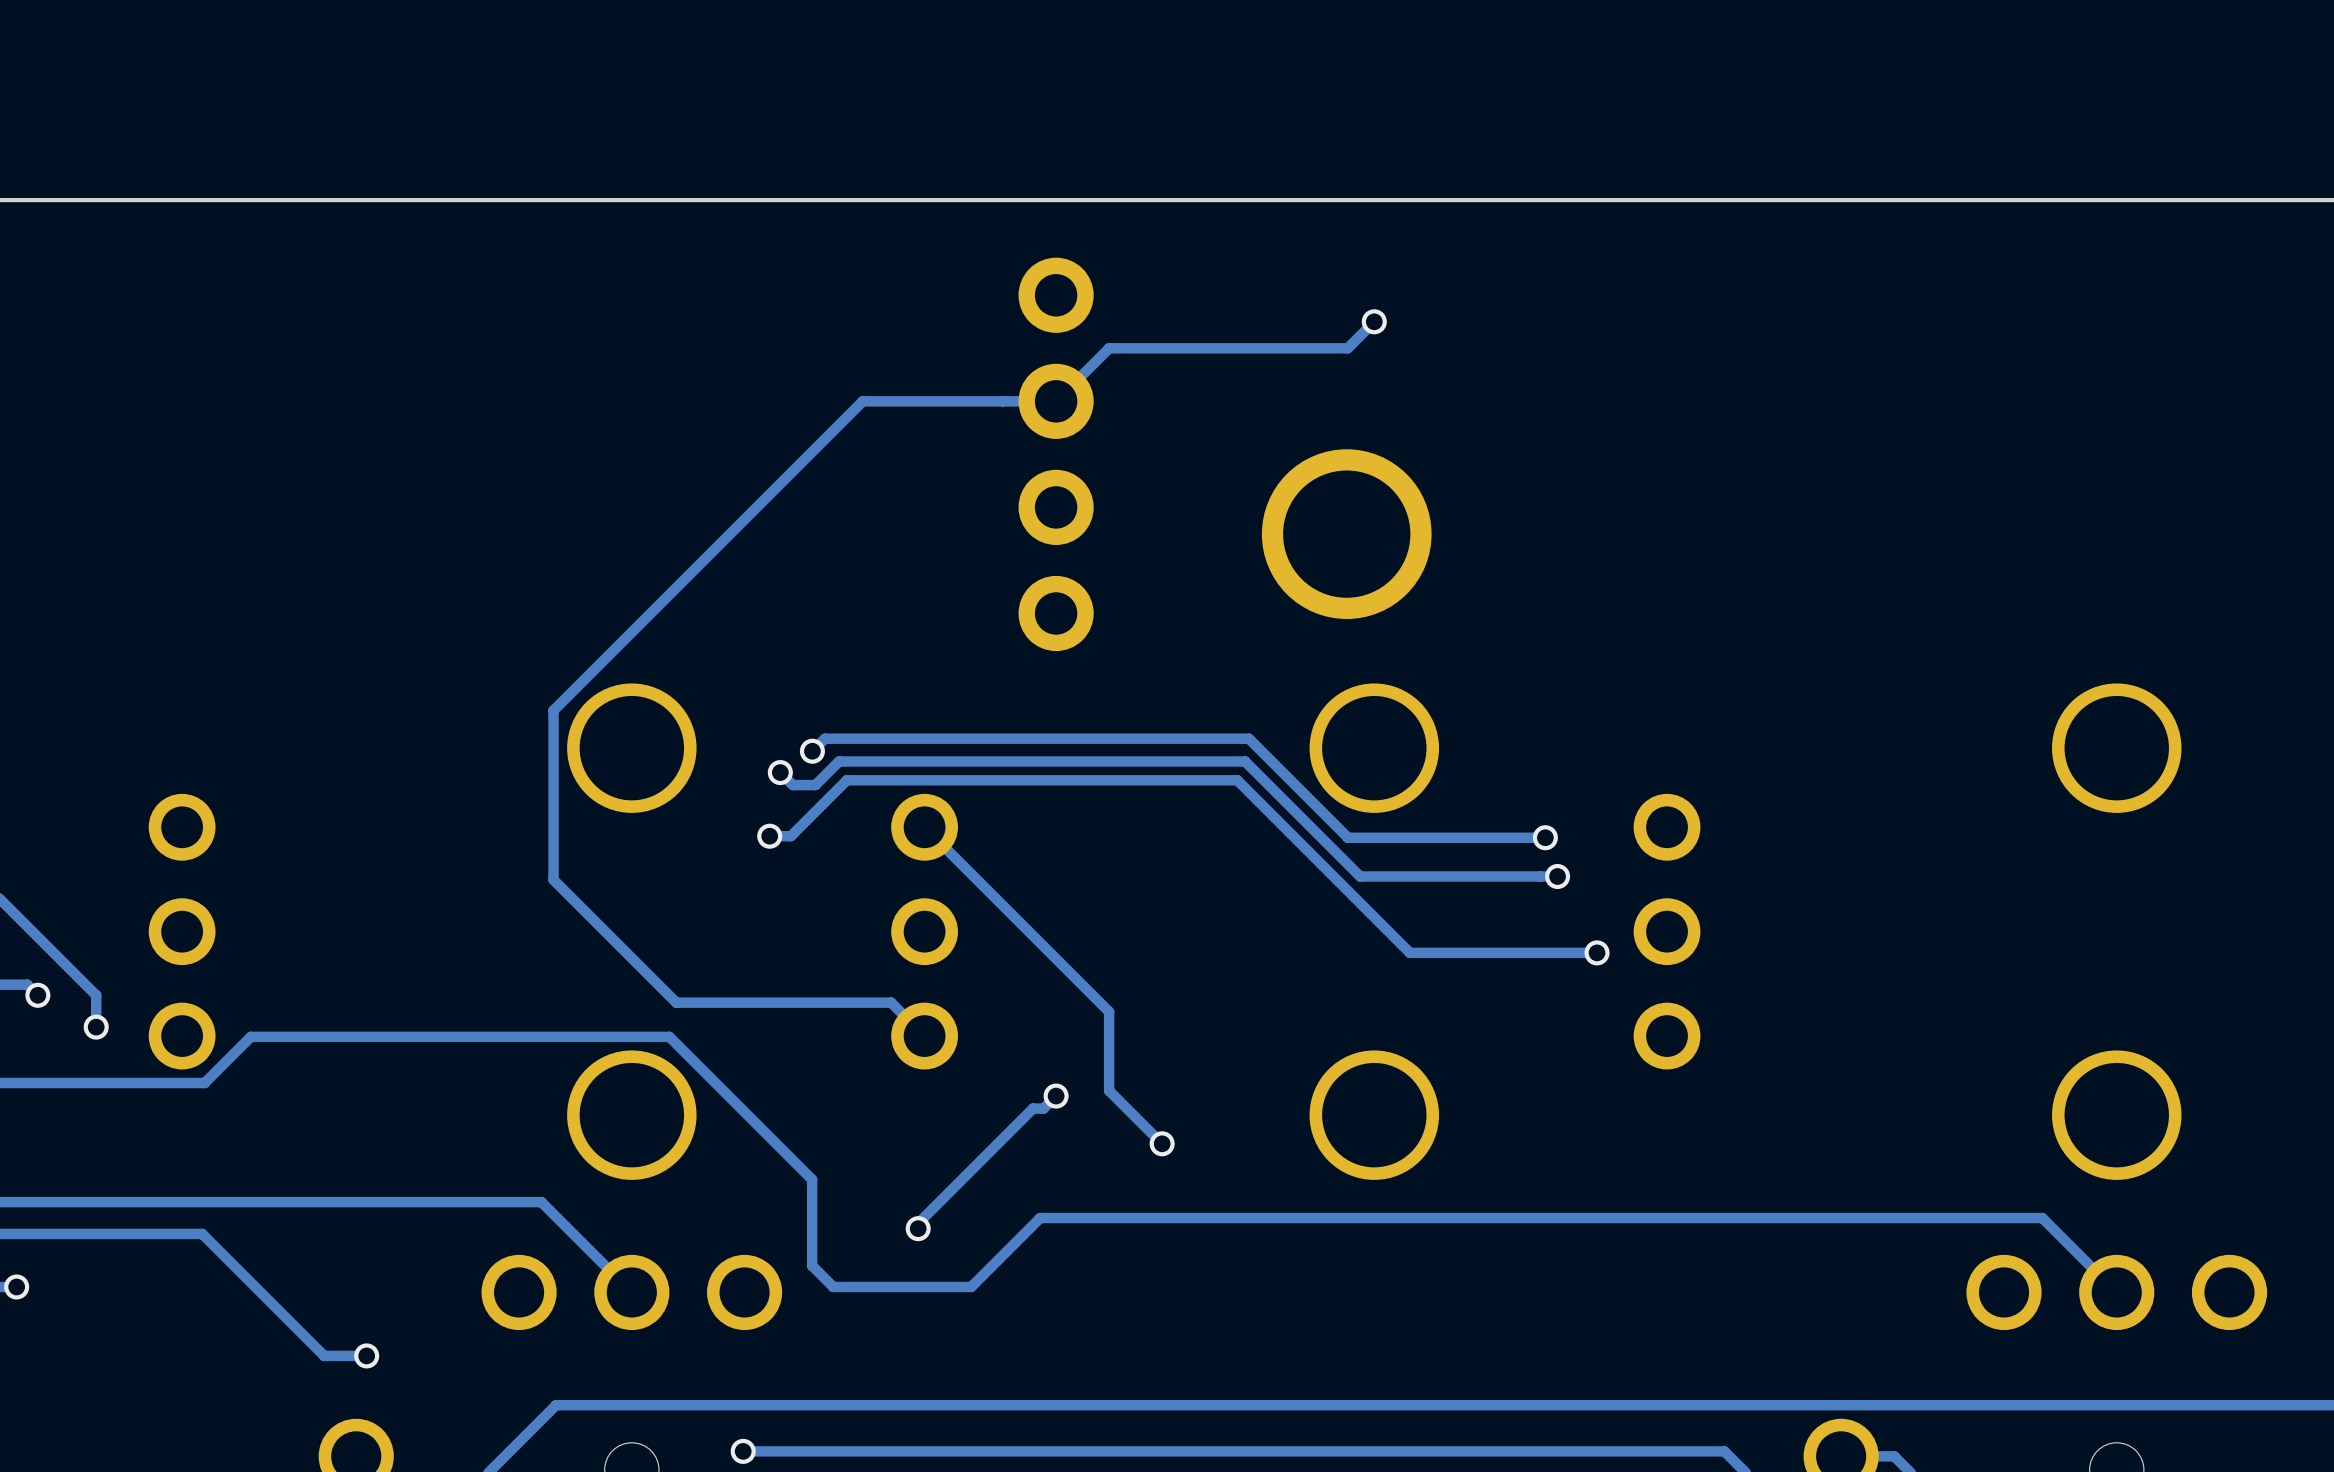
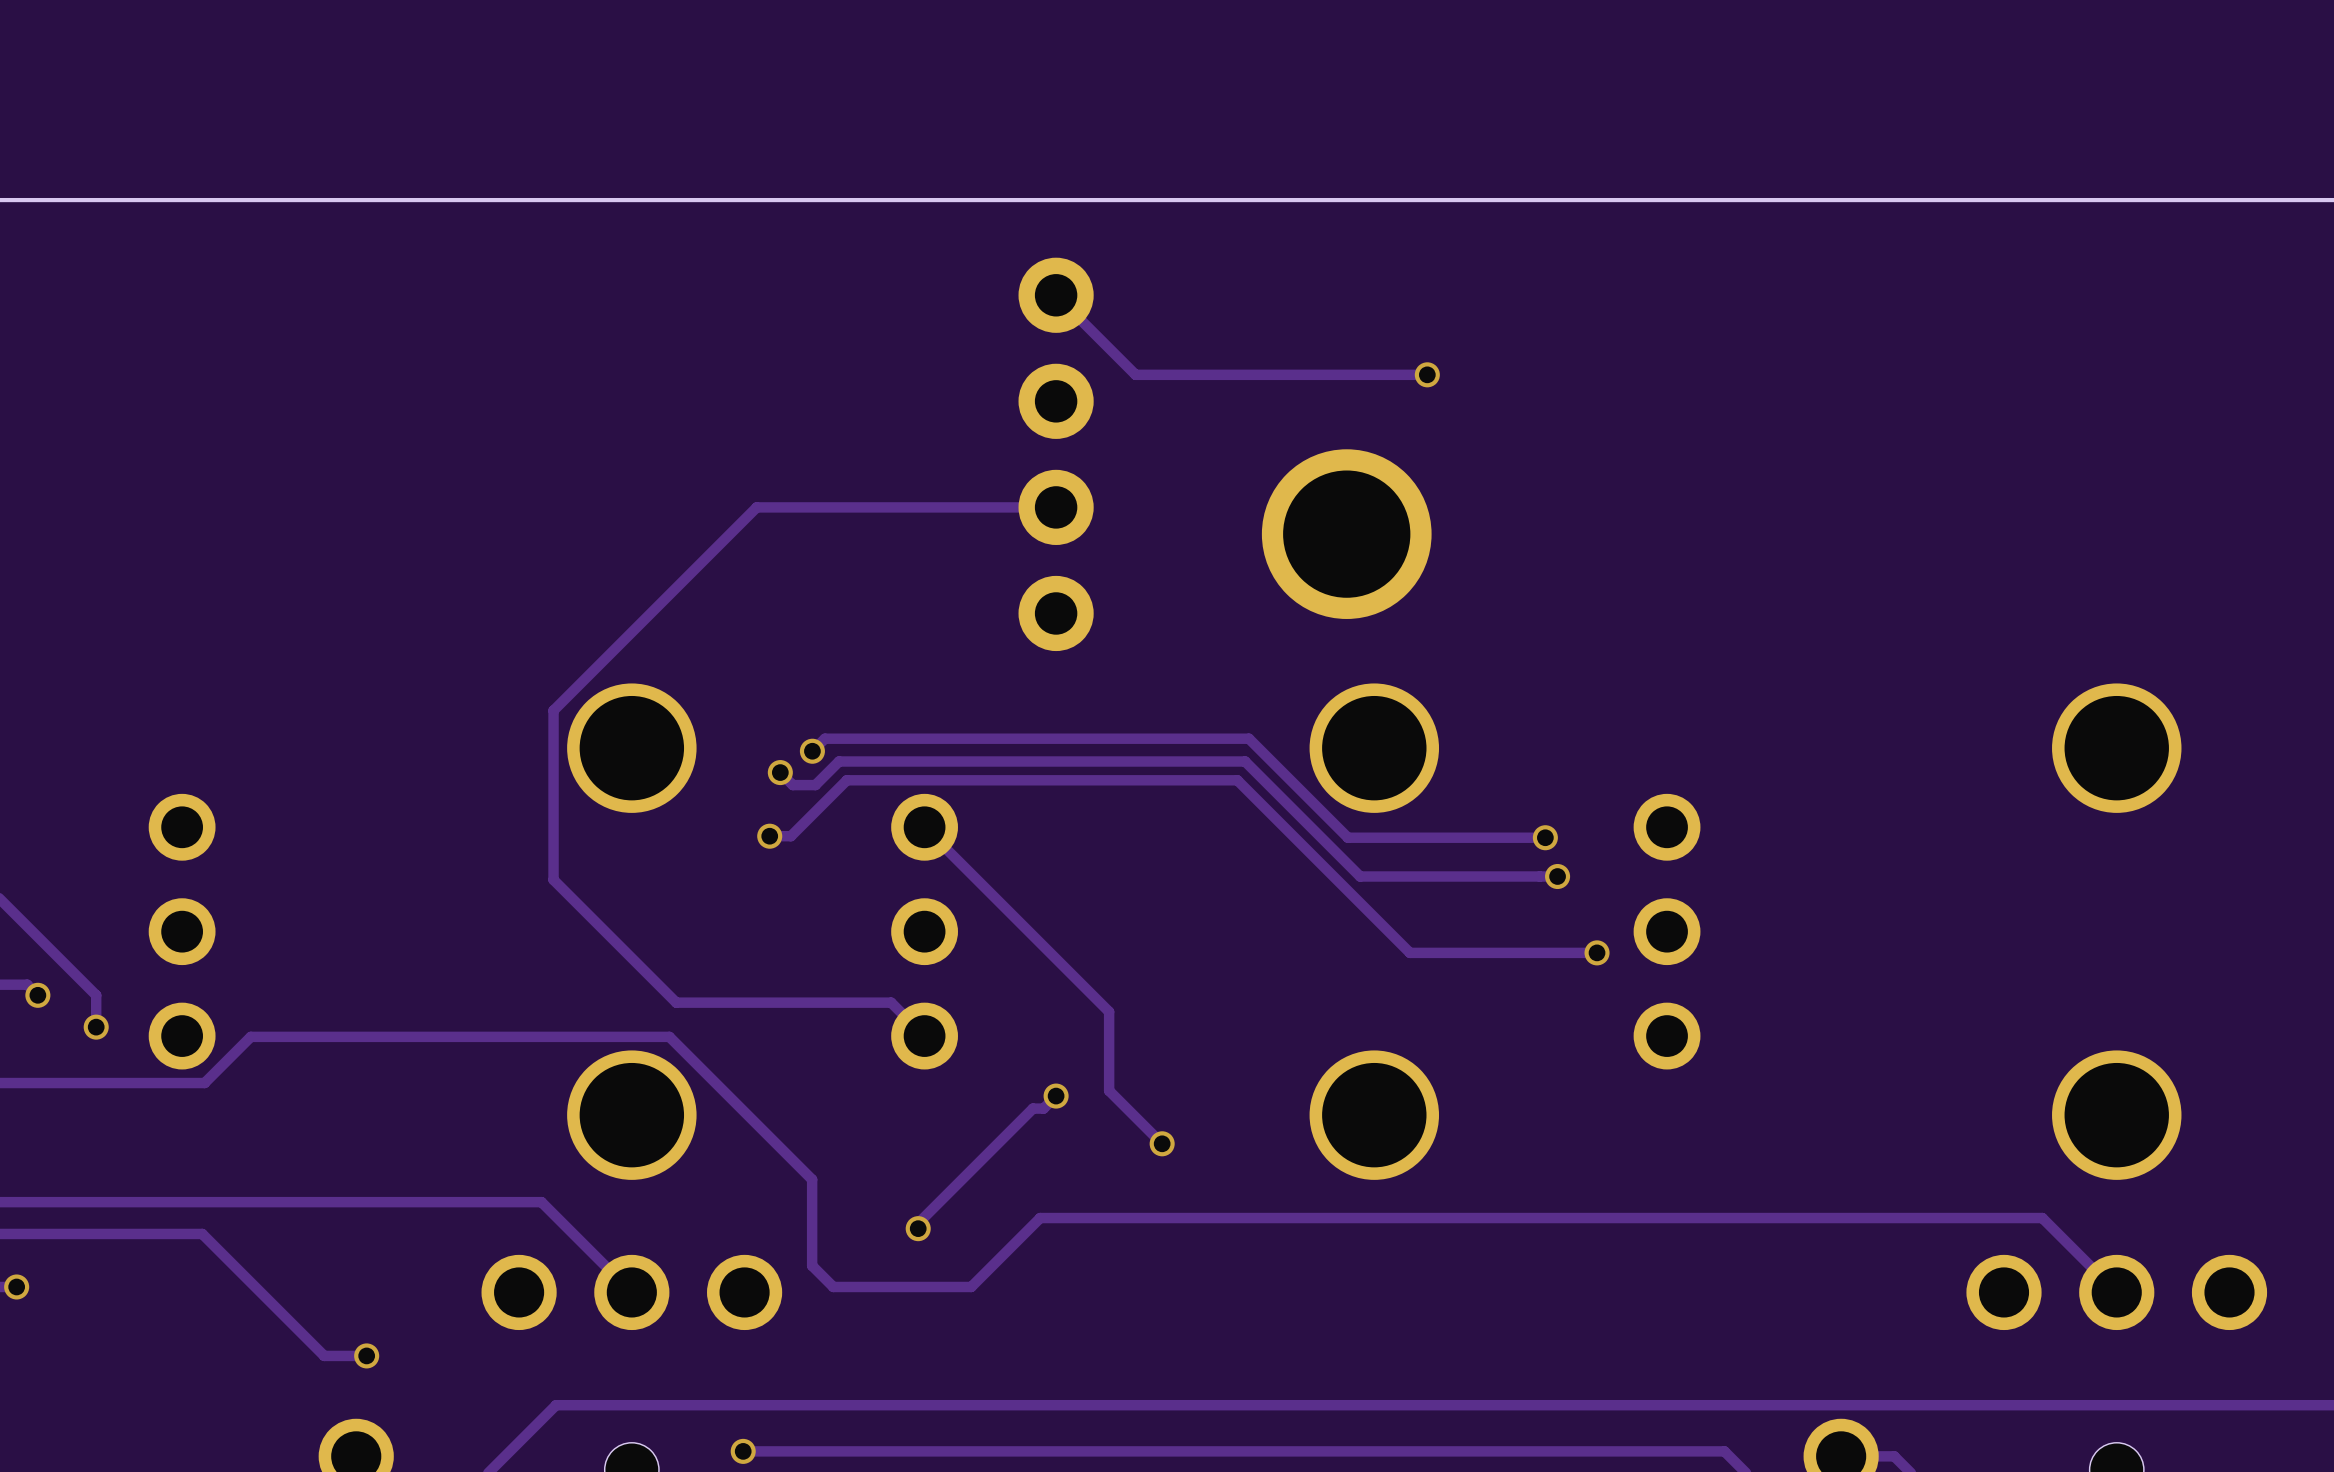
track: none -> (1056, 295) (1135, 374) (1427, 374)
track: (1374, 321) (1347, 348) (1109, 348) (1056, 401) (862, 401) (756, 507) -> (1056, 507) (756, 507)
via position: (1374, 321) -> (1427, 374)

